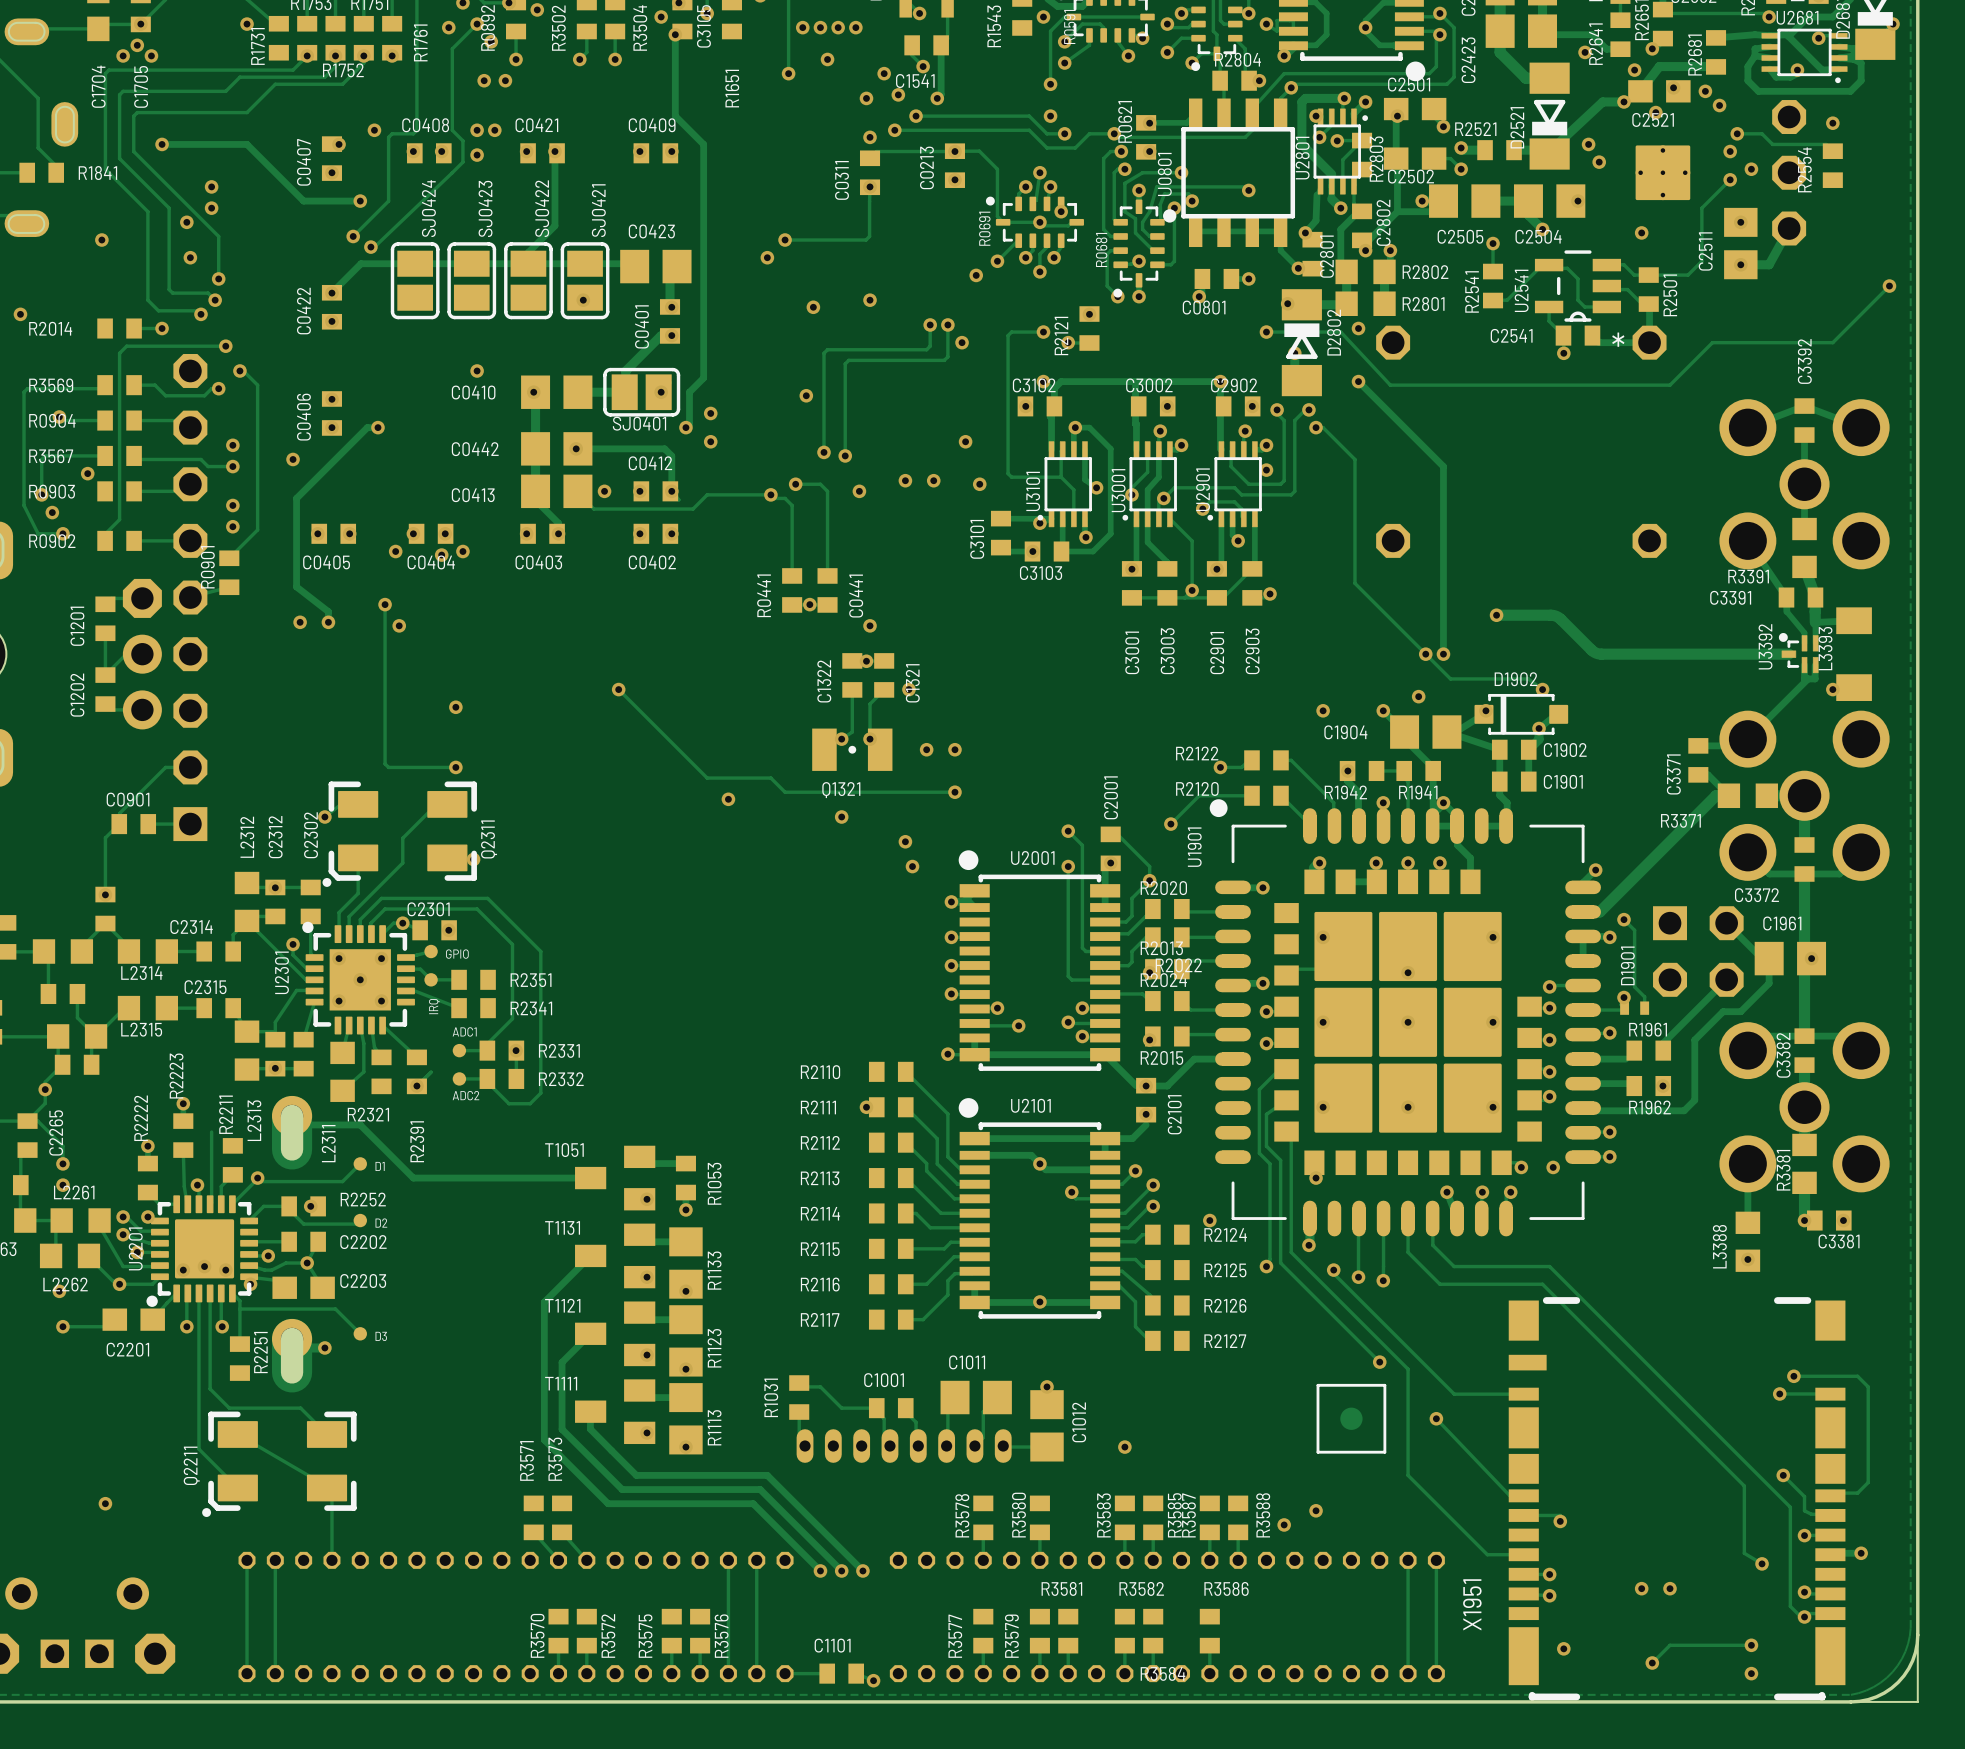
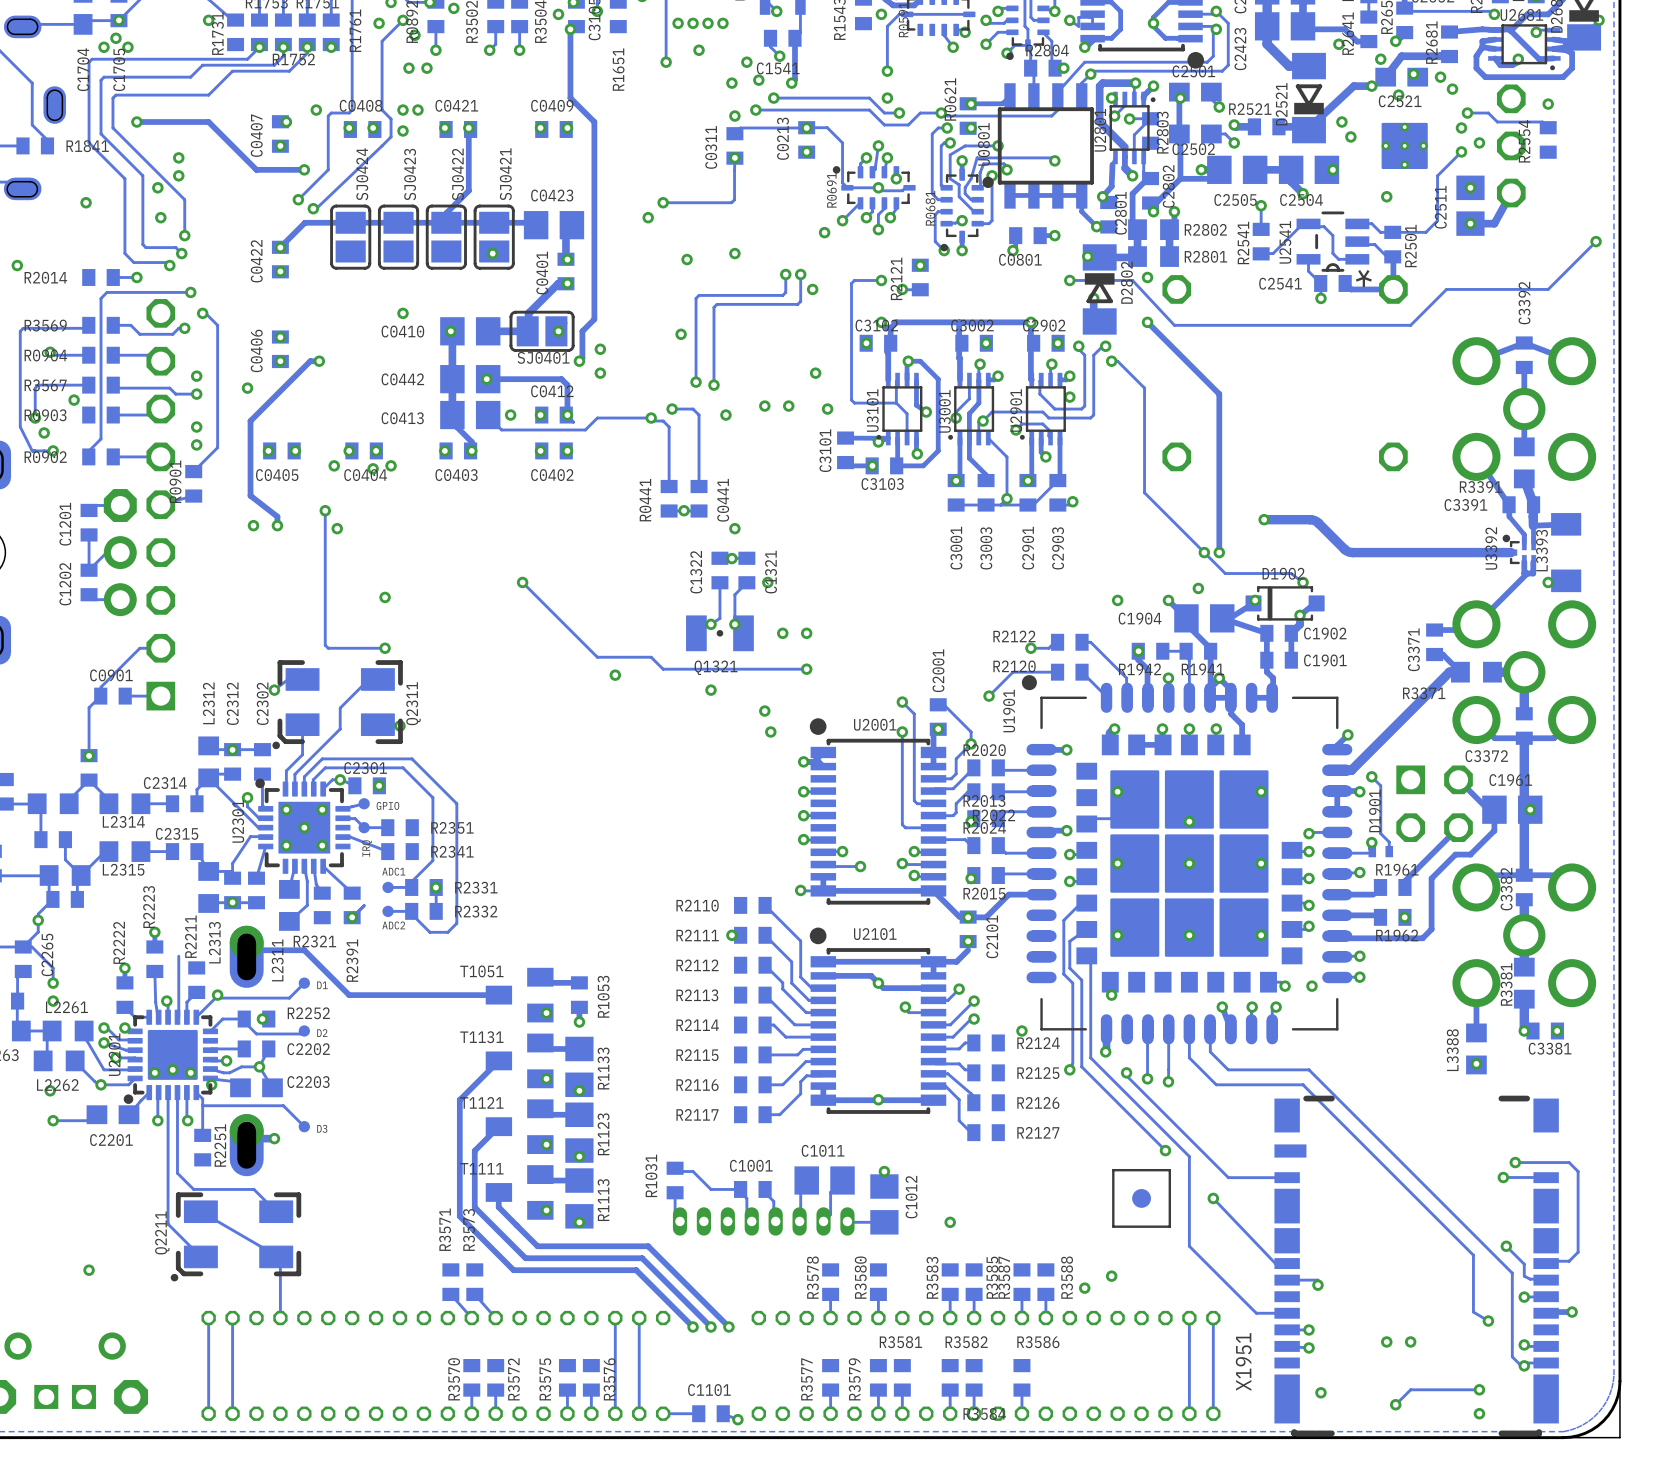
track: (1089, 35) (1089, 45) (1064, 63) -> none
track: (1103, 35) (1103, 27) (1100, 24) (1082, 24) (1064, 41) -> none
via: (1064, 41) -> none
via: (1064, 63) -> none

